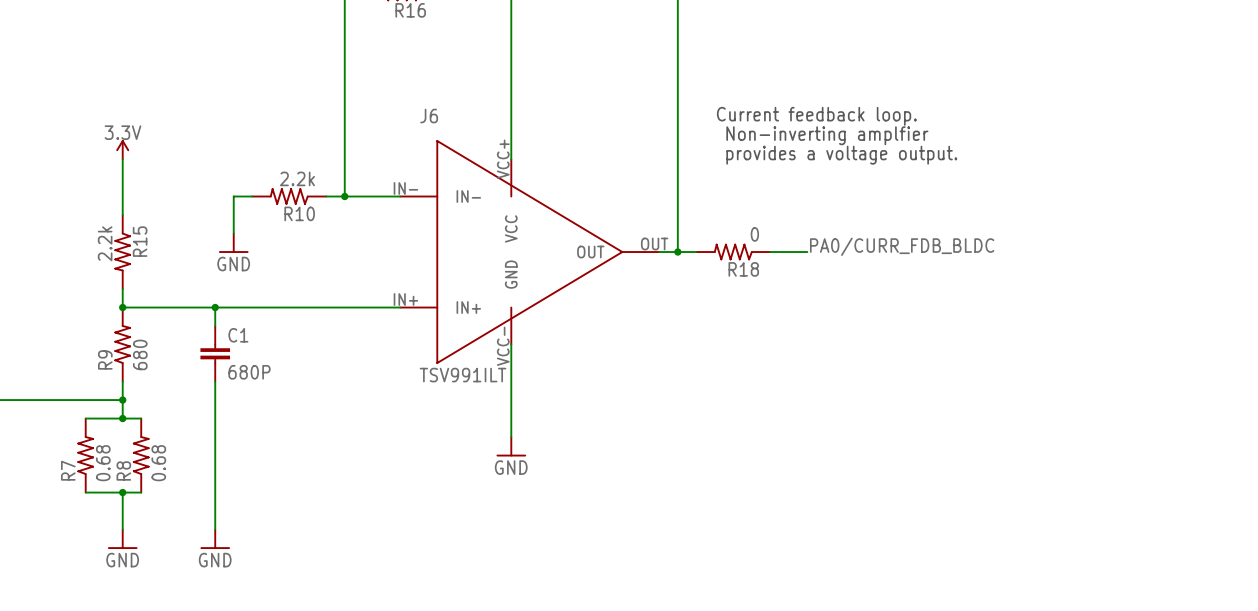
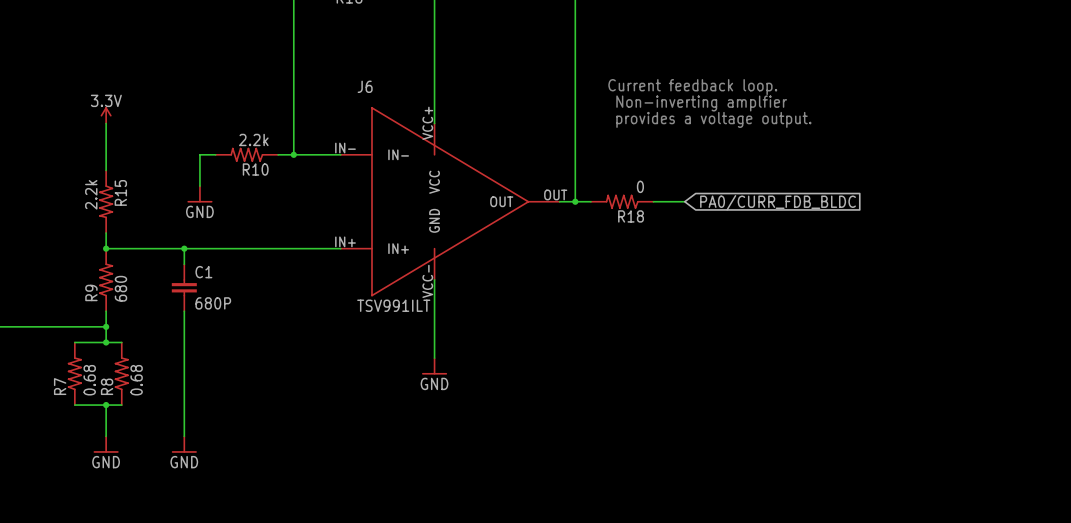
label: PA0/CURR_FDB_BLDC (902, 246) -> none
global label: none -> PA0/CURR_FDB_BLDC (778, 202)

